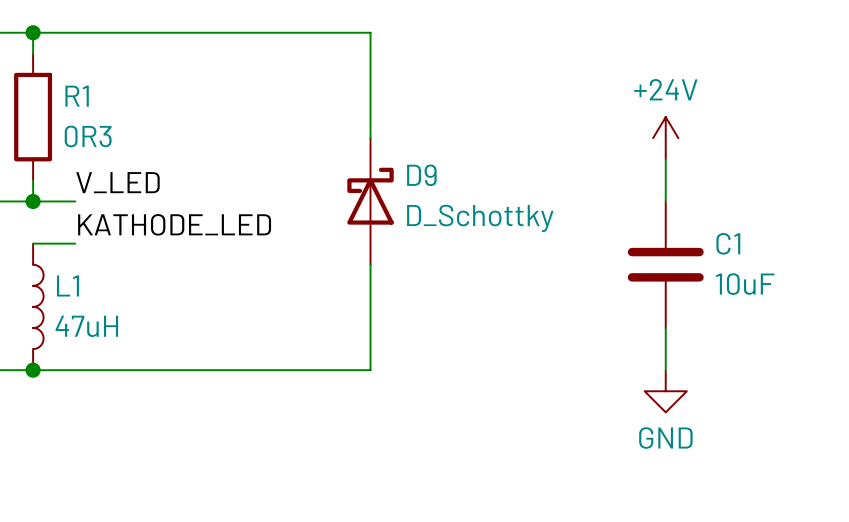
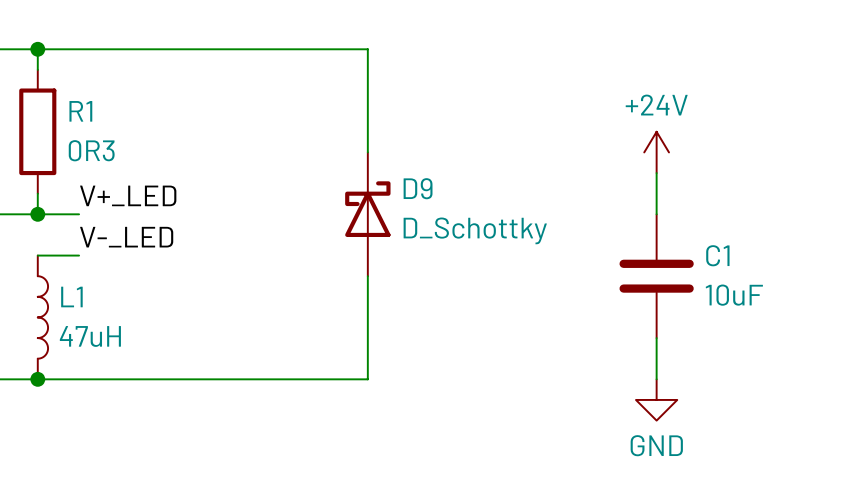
label: V_LED (118, 182) -> V+_LED (128, 195)
label: KATHODE_LED (174, 224) -> V-_LED (126, 237)

